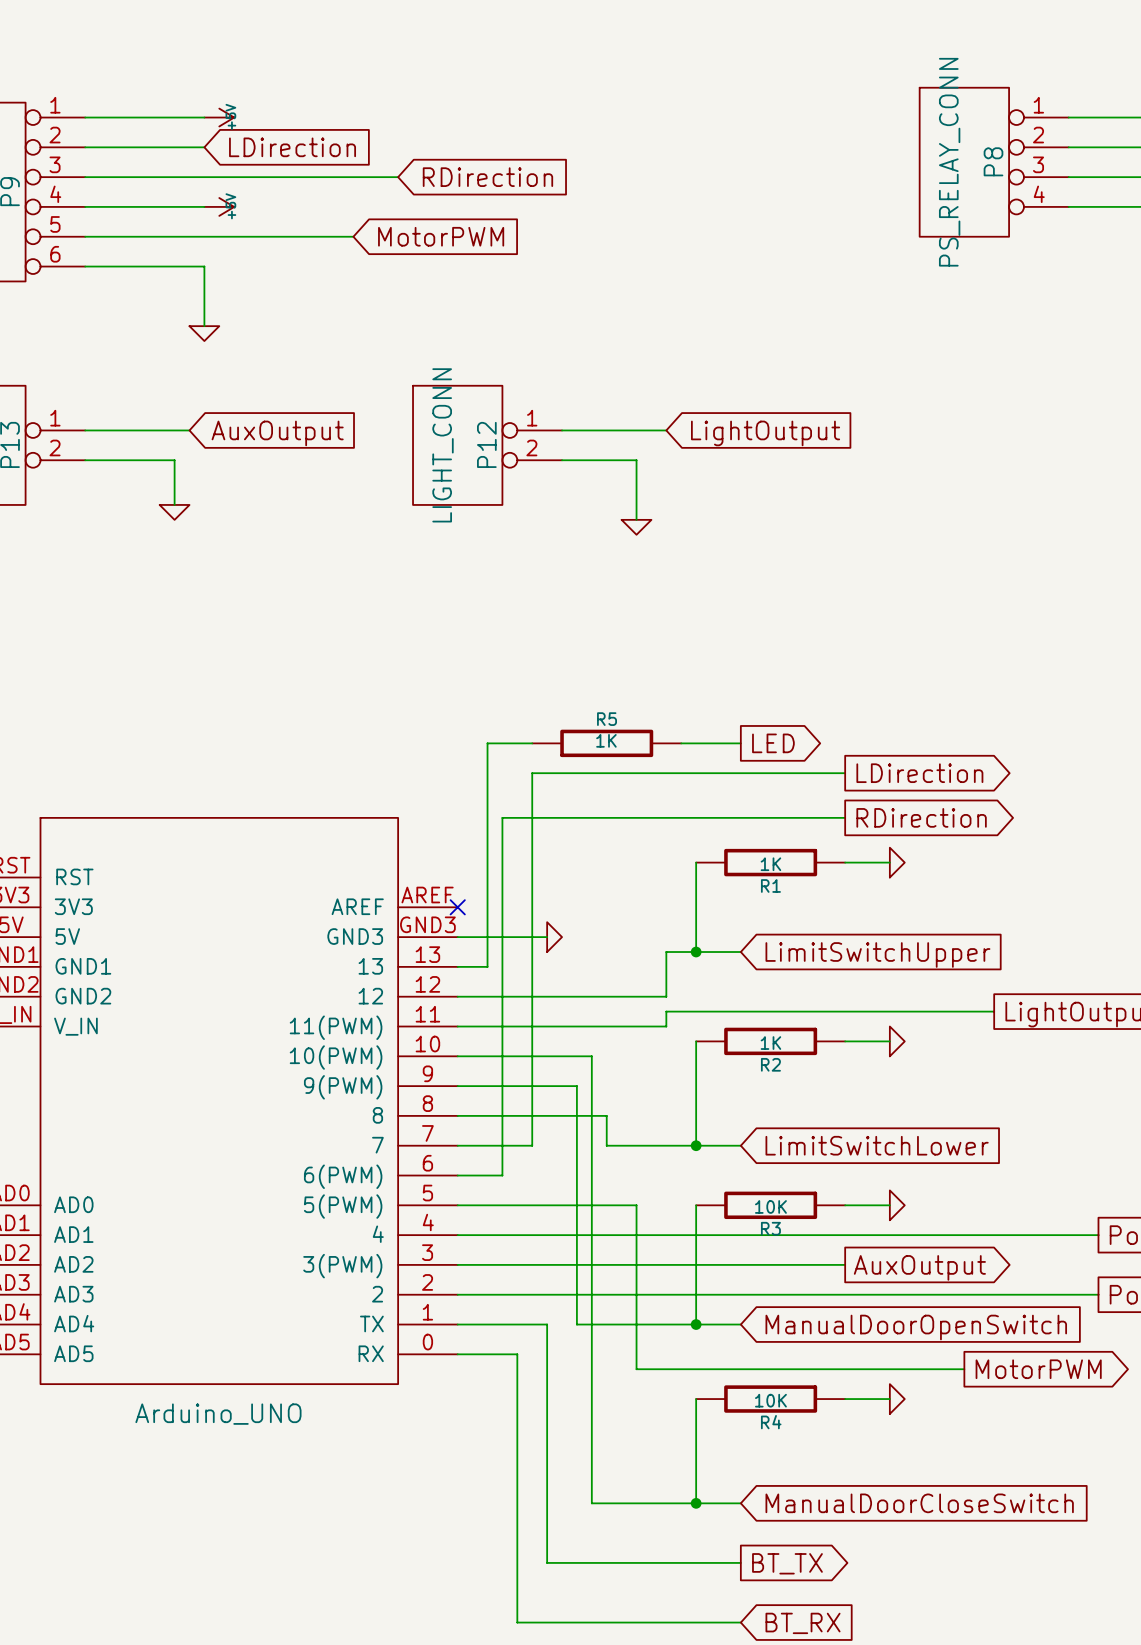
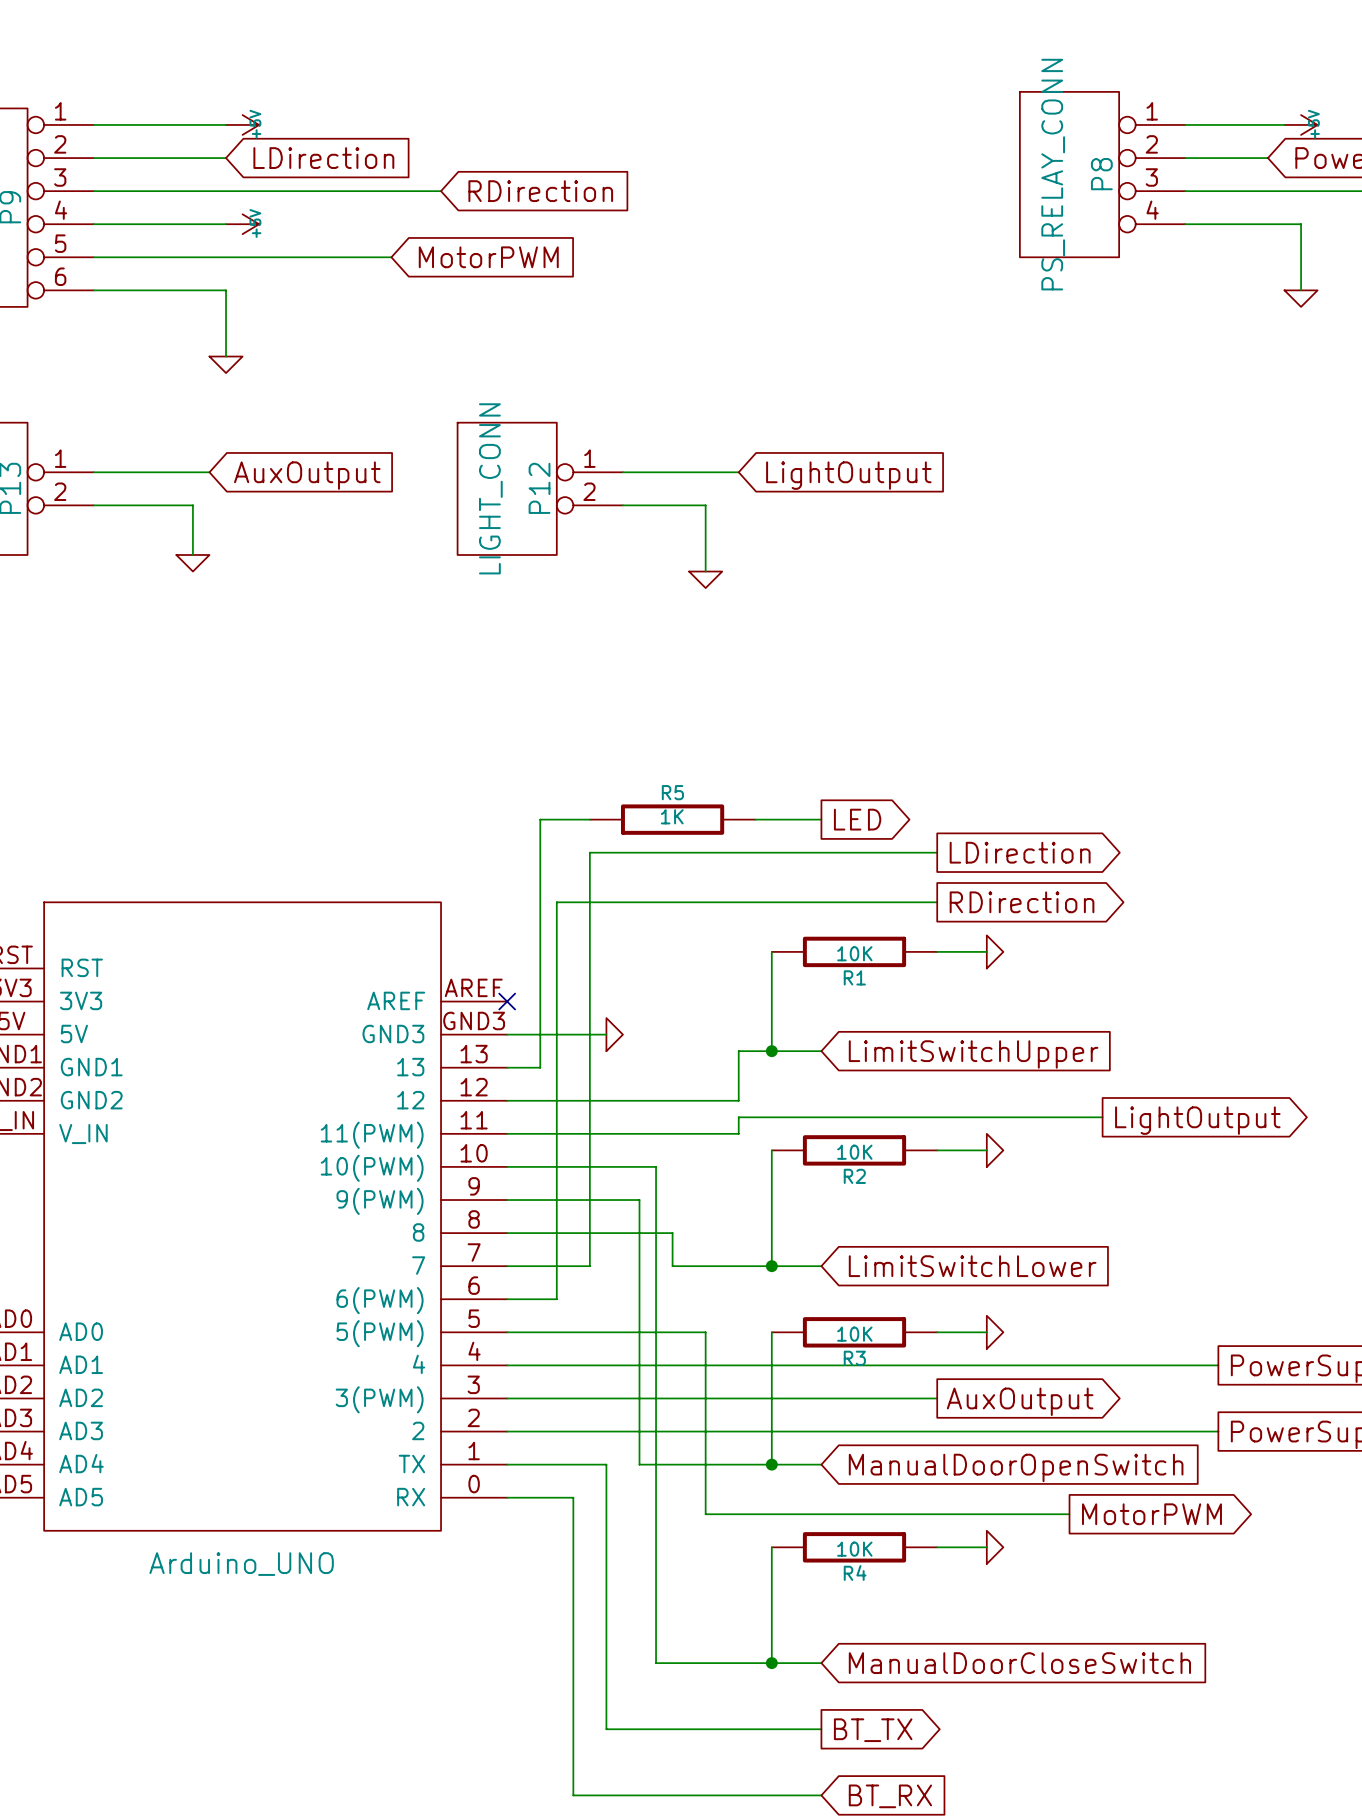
R1 value: 1K (770, 864) -> 10K (854, 953)
R2 value: 1K (770, 1043) -> 10K (854, 1152)

